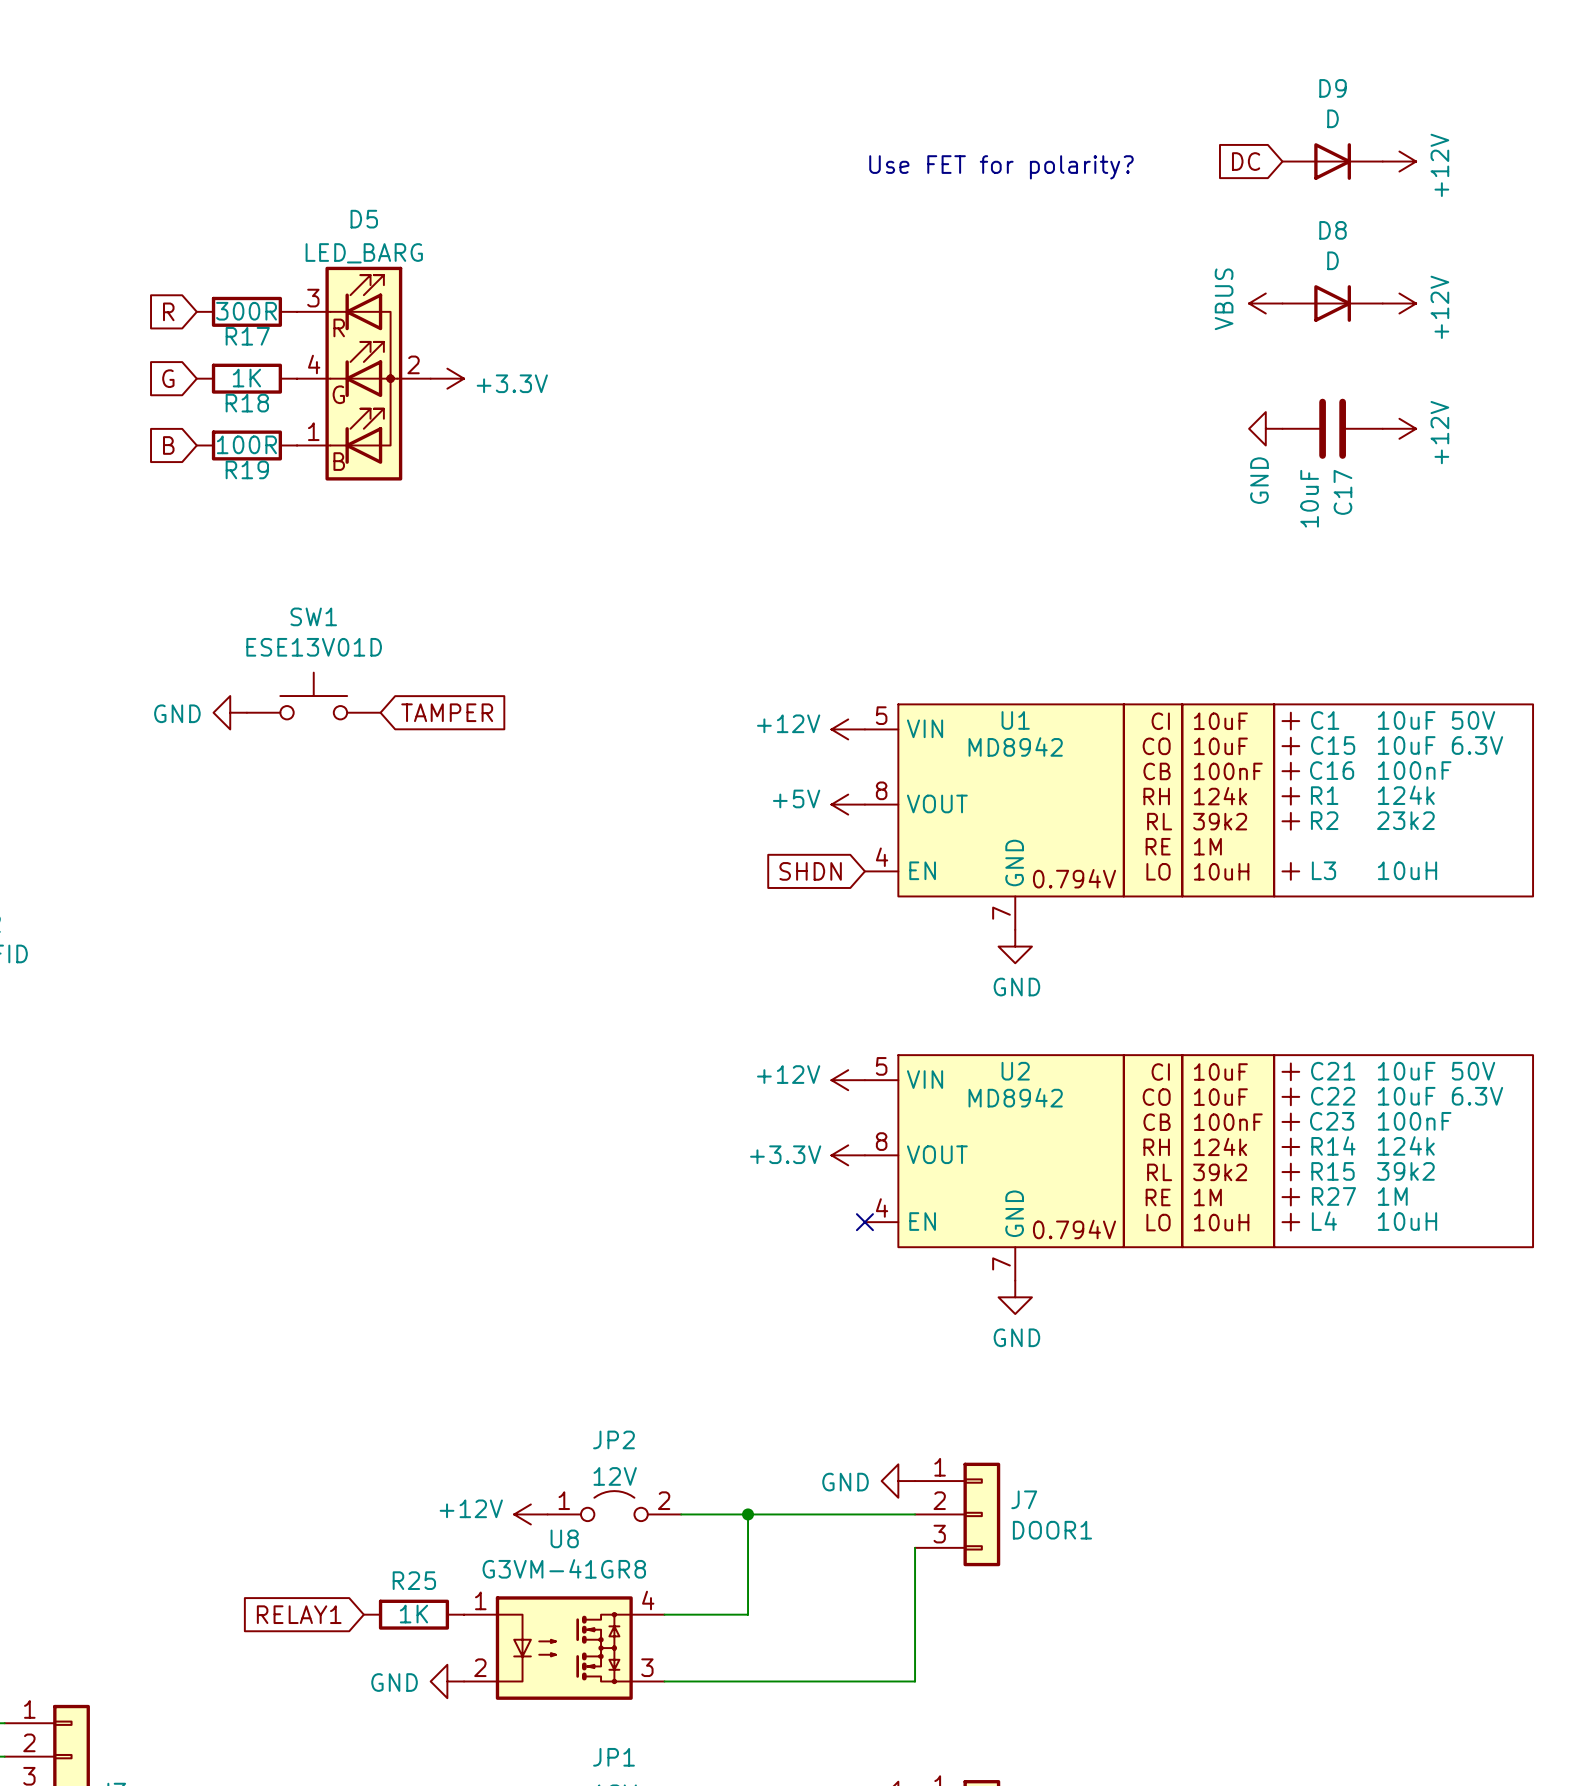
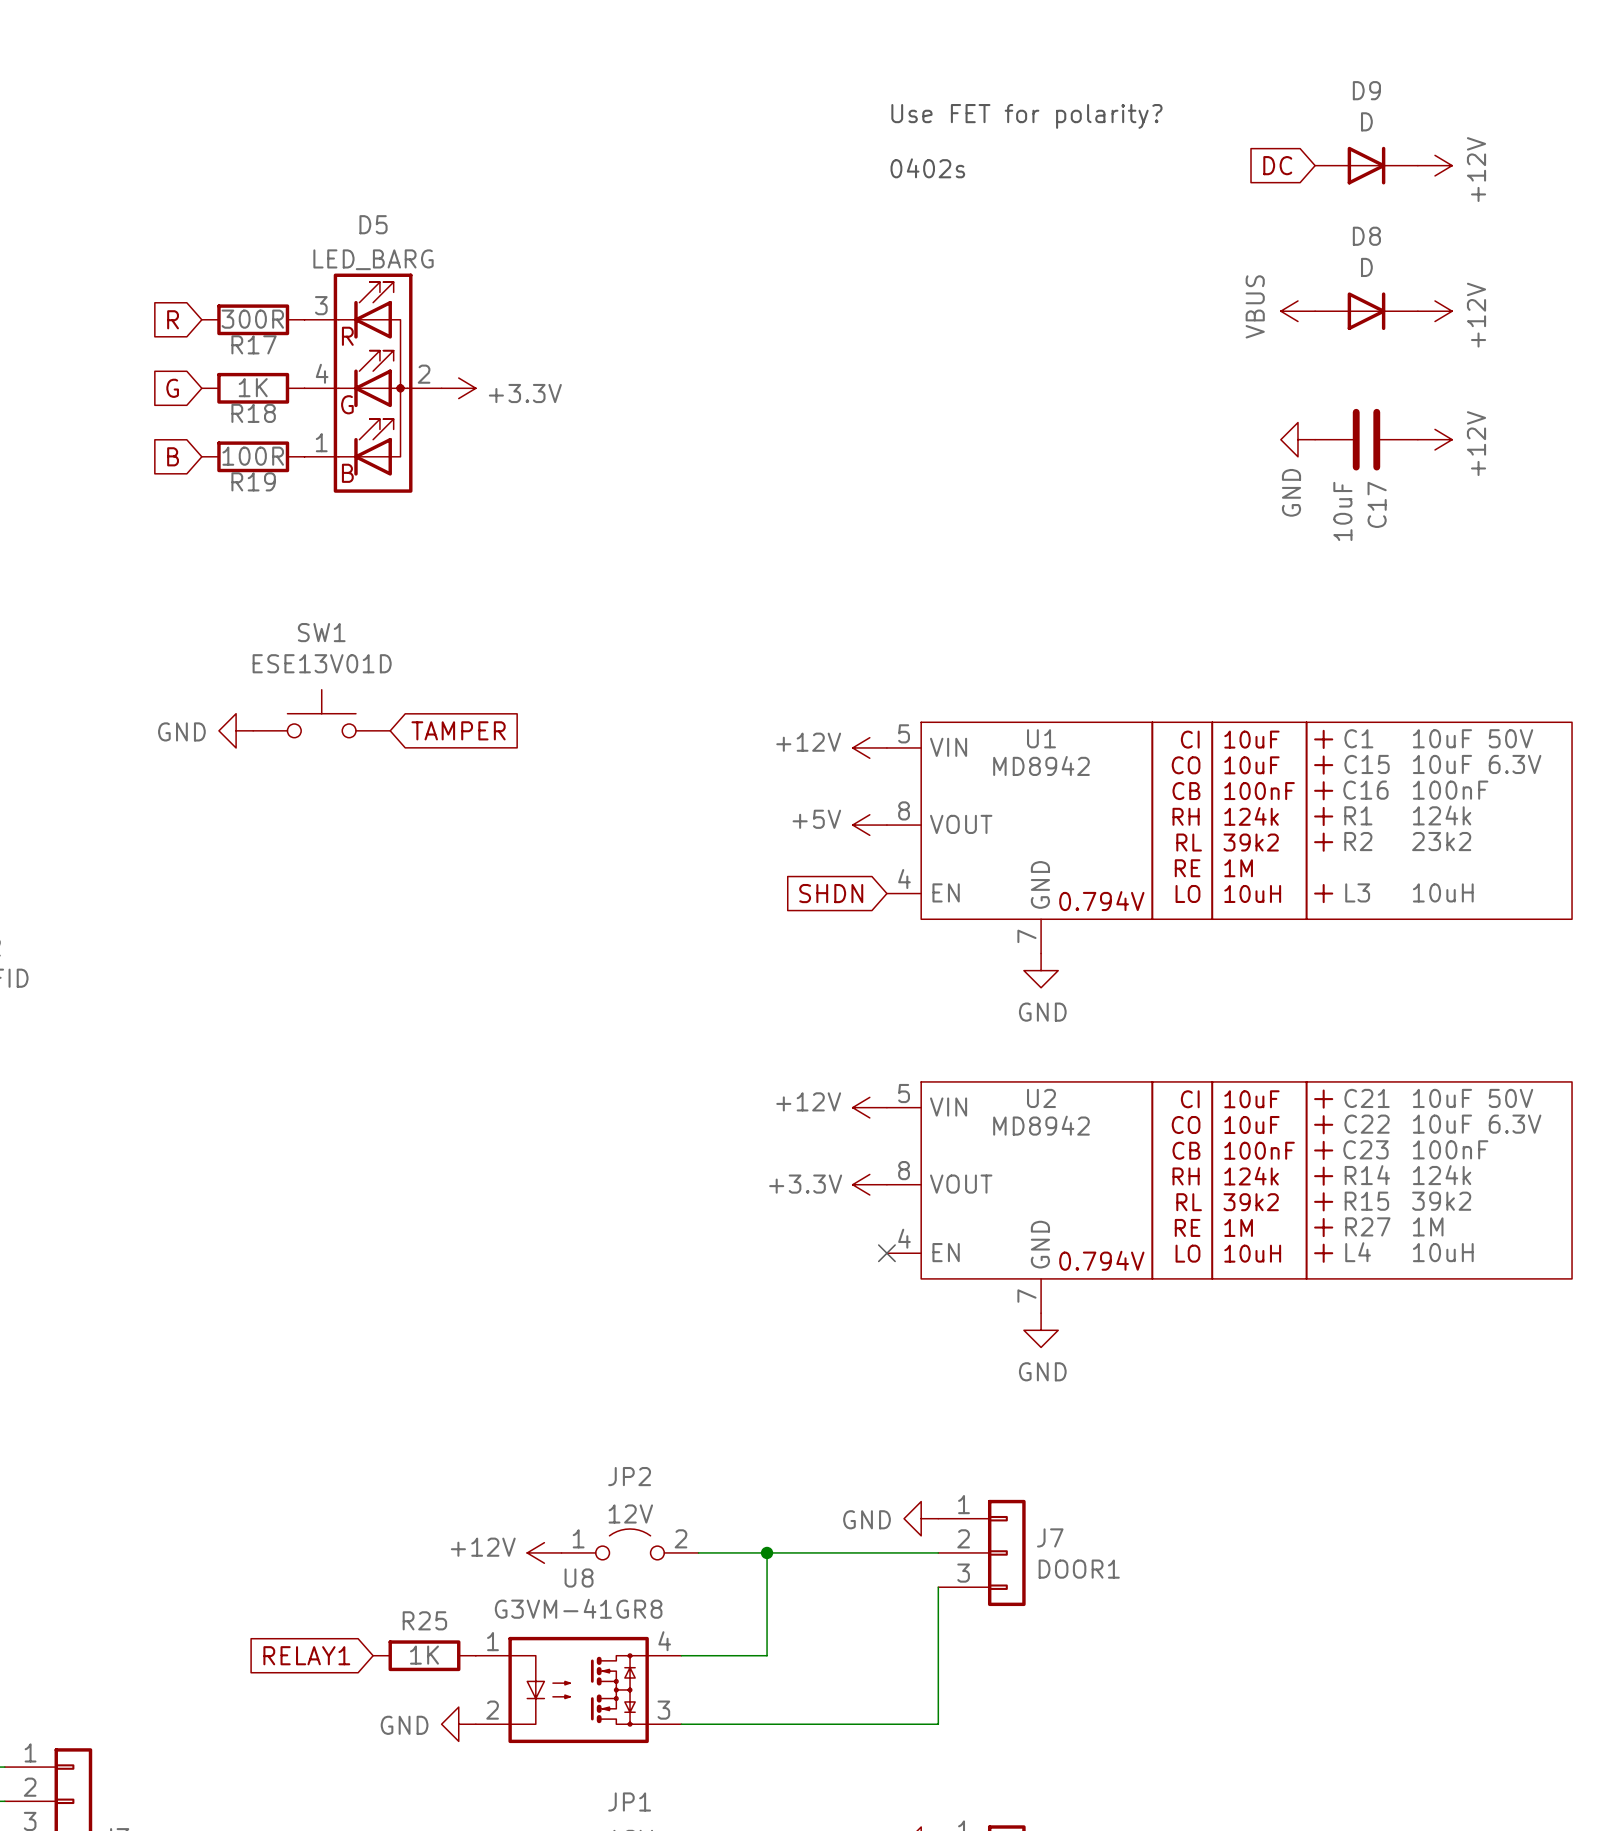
text: none -> Use FET for polarity? (1026, 116)
text: Use FET for polarity? (1001, 167) -> 0402s (927, 168)

